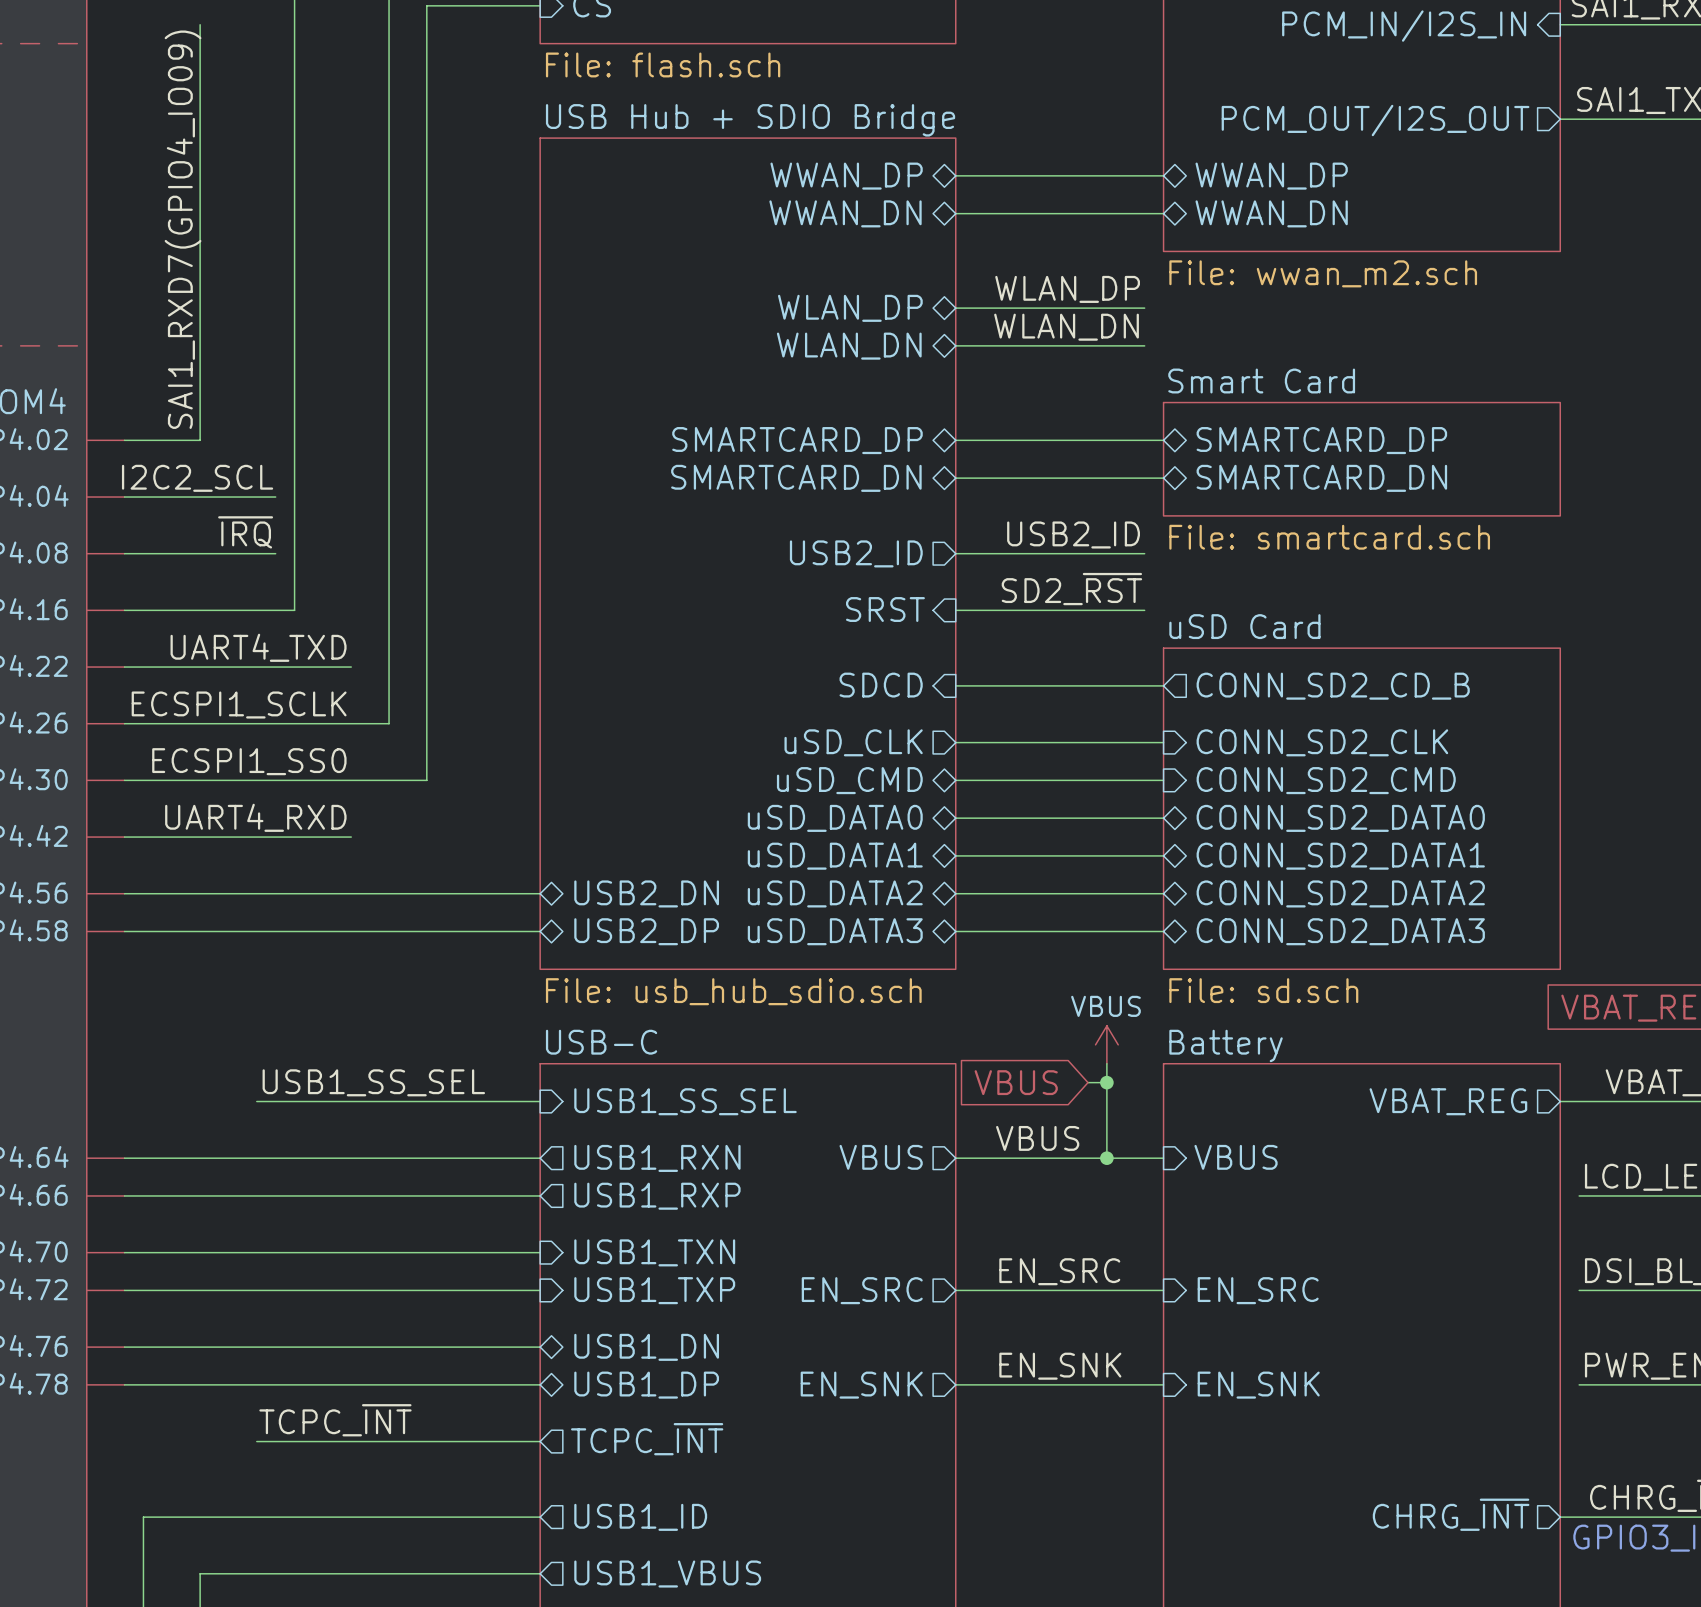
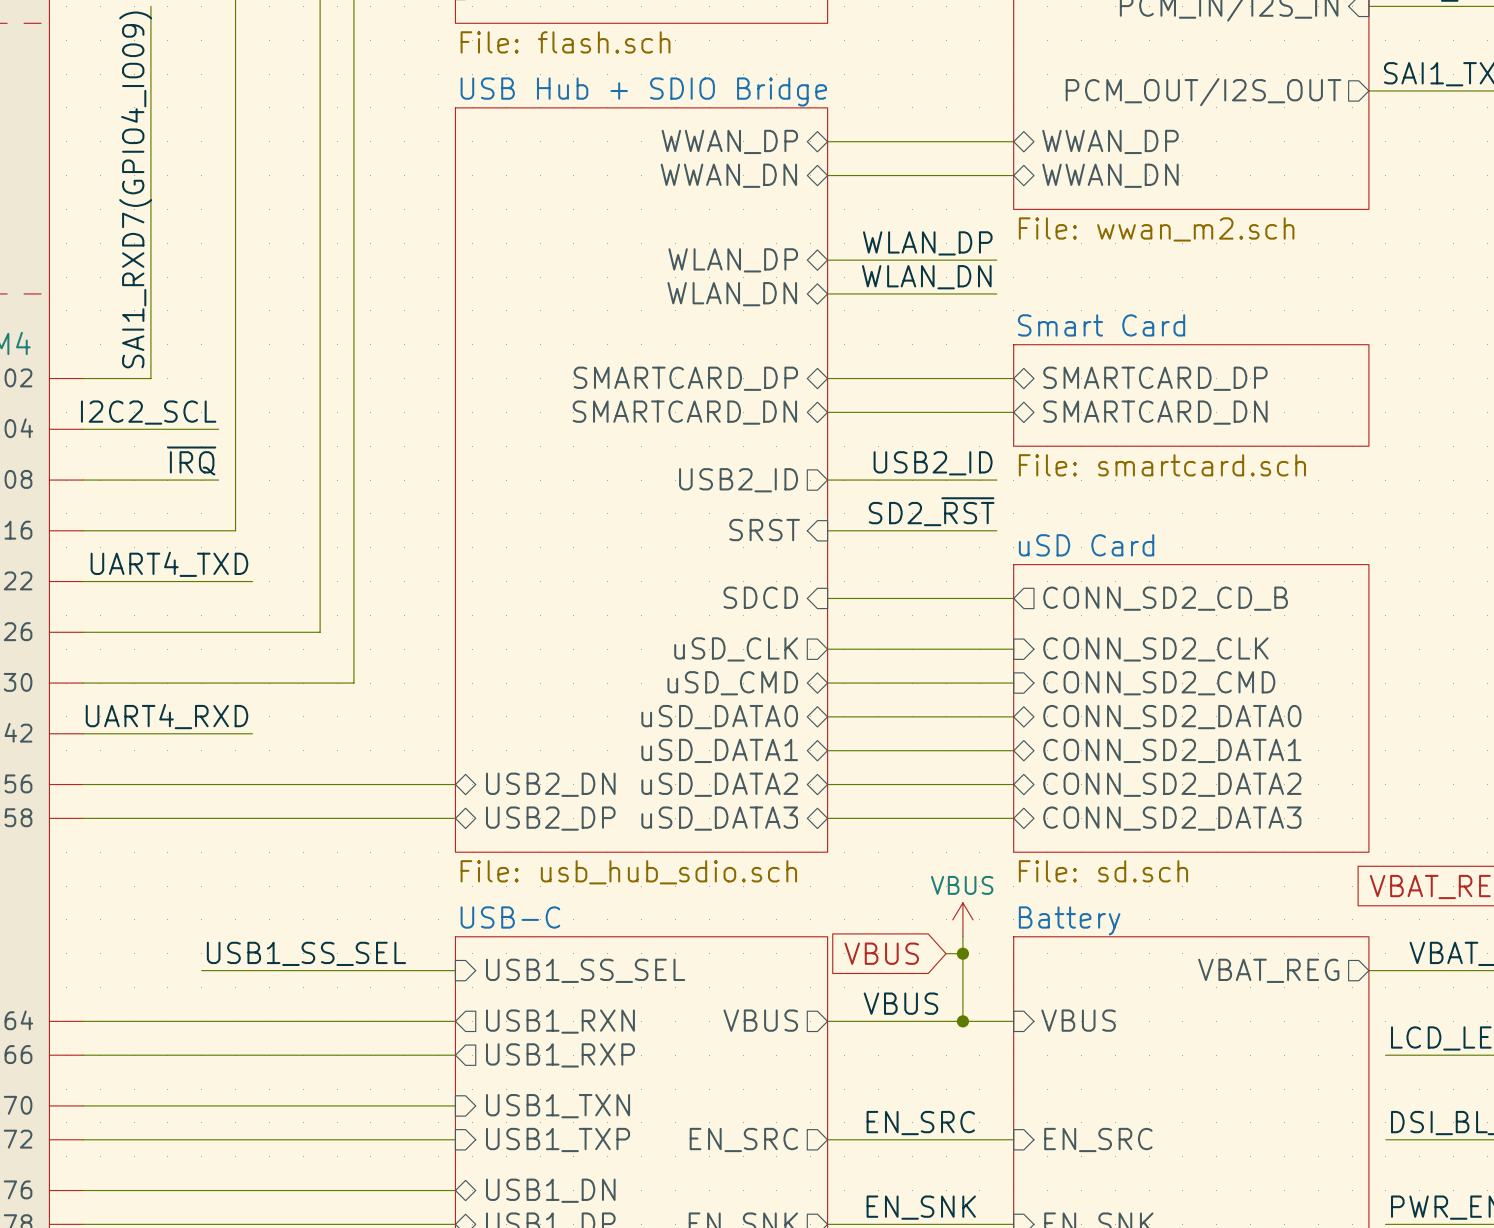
label position: UART4_TXD (258, 647) -> UART4_TXD (169, 564)
wire: (313, 667) (351, 667) -> none
label: ECSPI1_SCLK (239, 705) -> none
label: ECSPI1_SS0 (249, 761) -> none
label position: UART4_RXD (255, 817) -> UART4_RXD (167, 716)
wire: (313, 837) (351, 837) -> none

